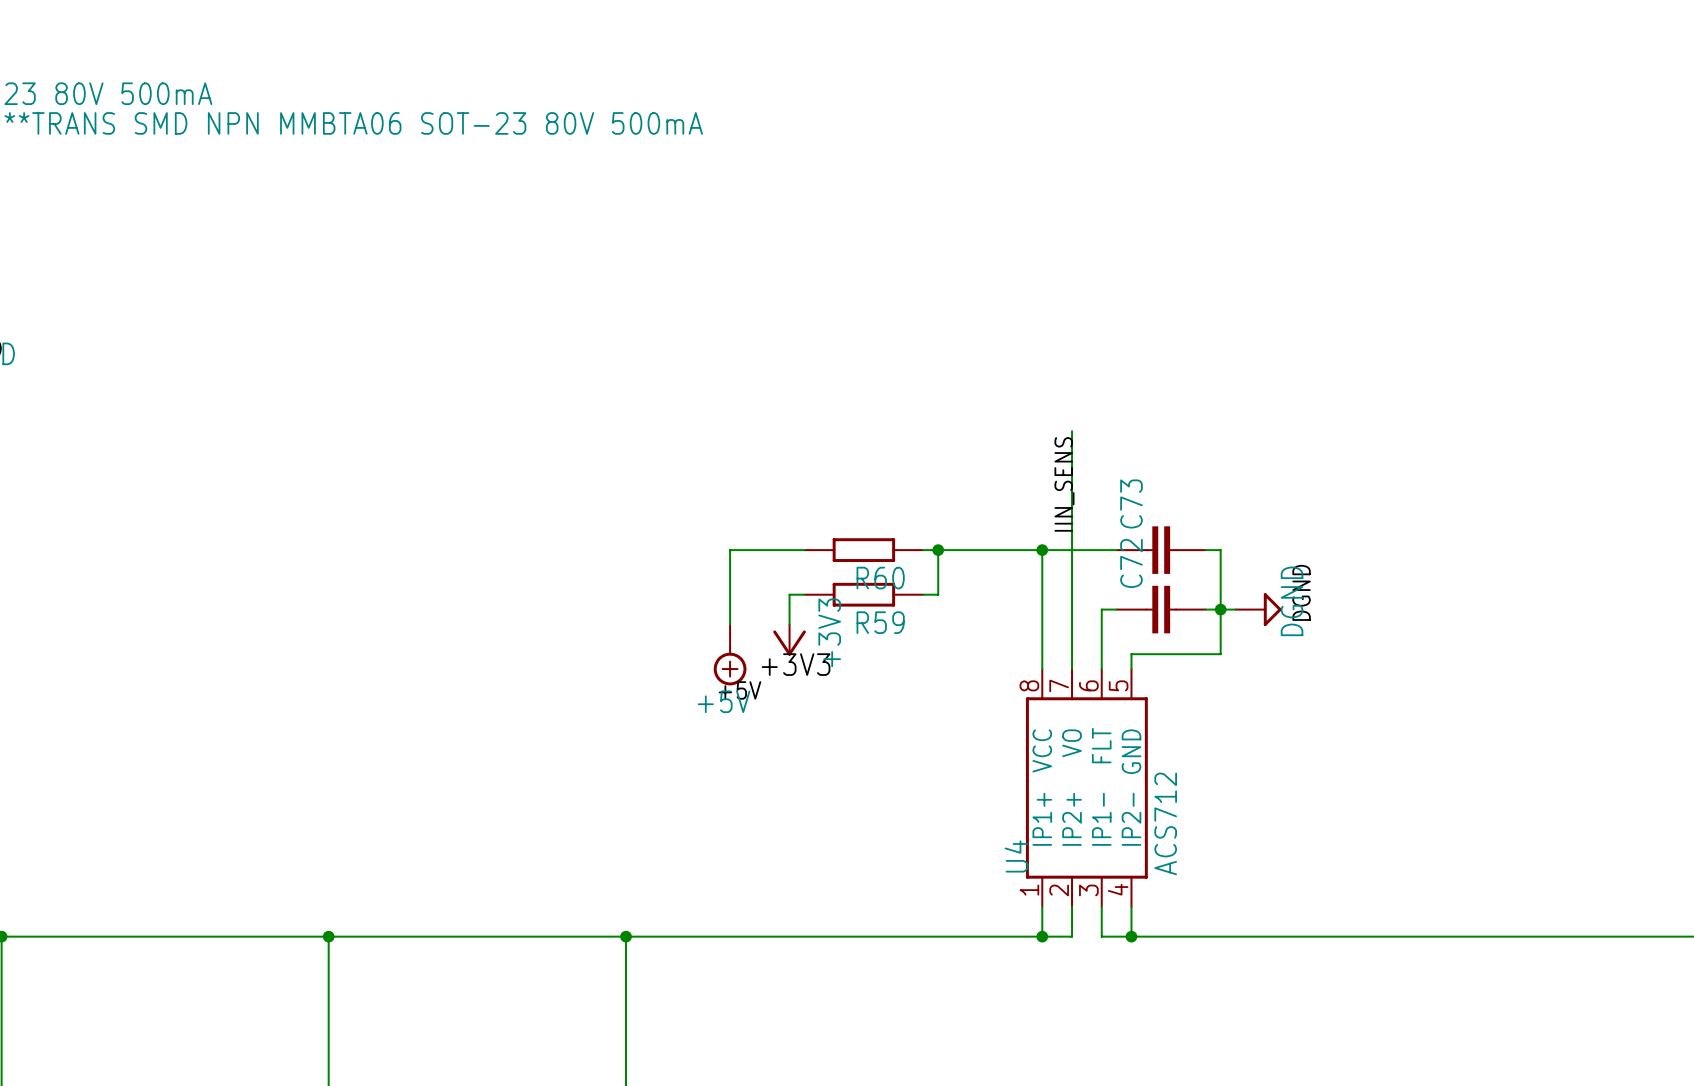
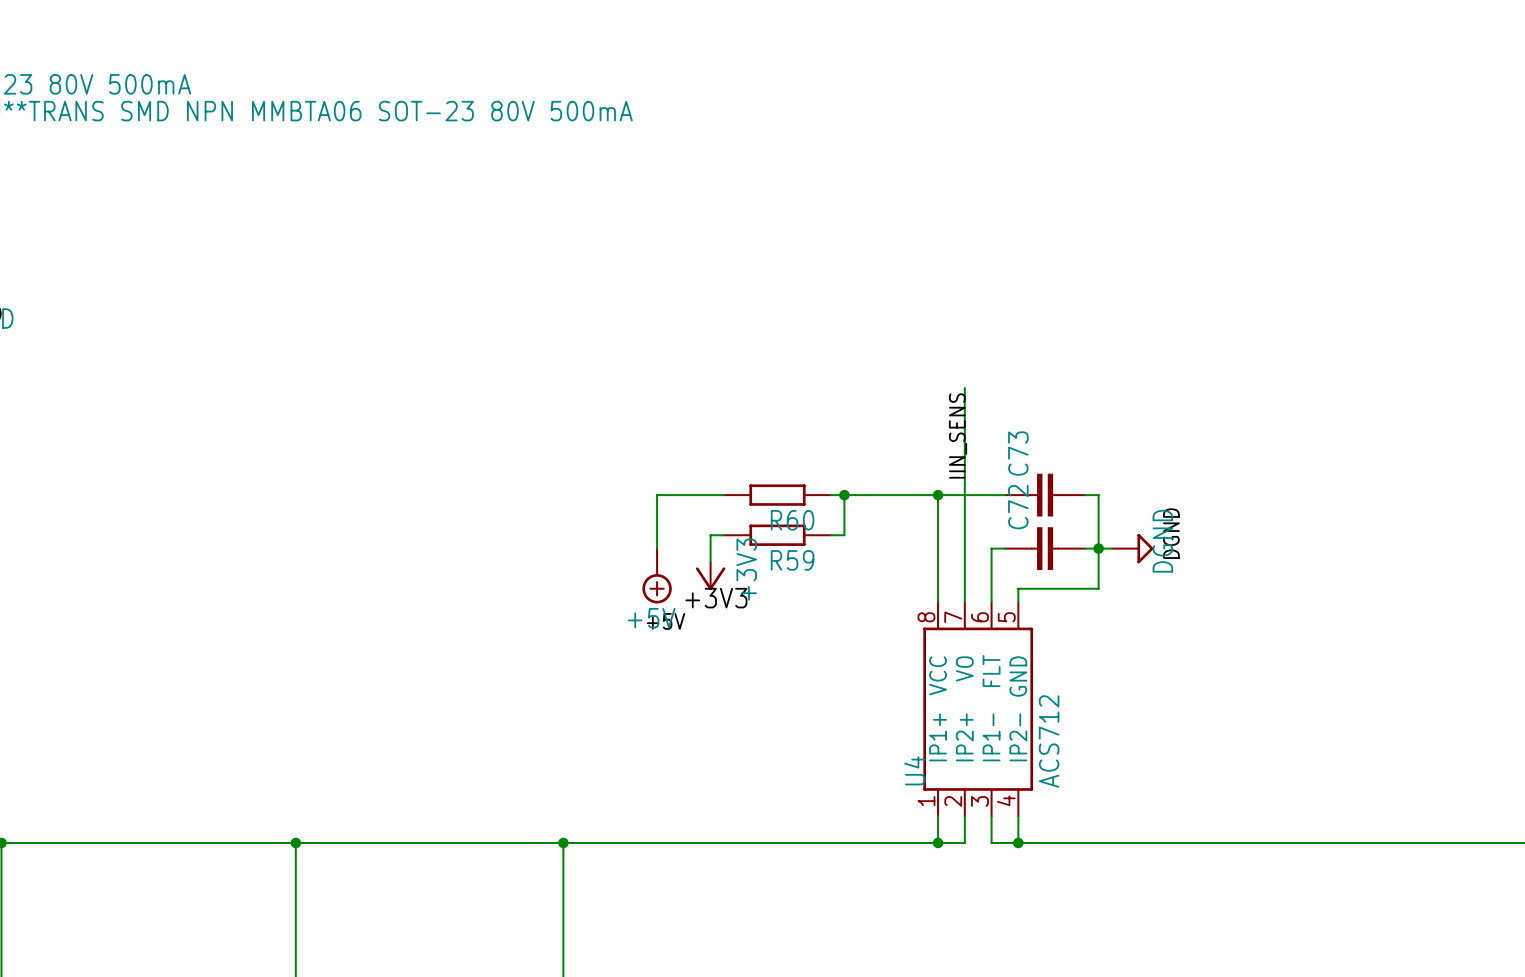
power symbol position: +5V (730, 654) -> +5V (657, 576)

